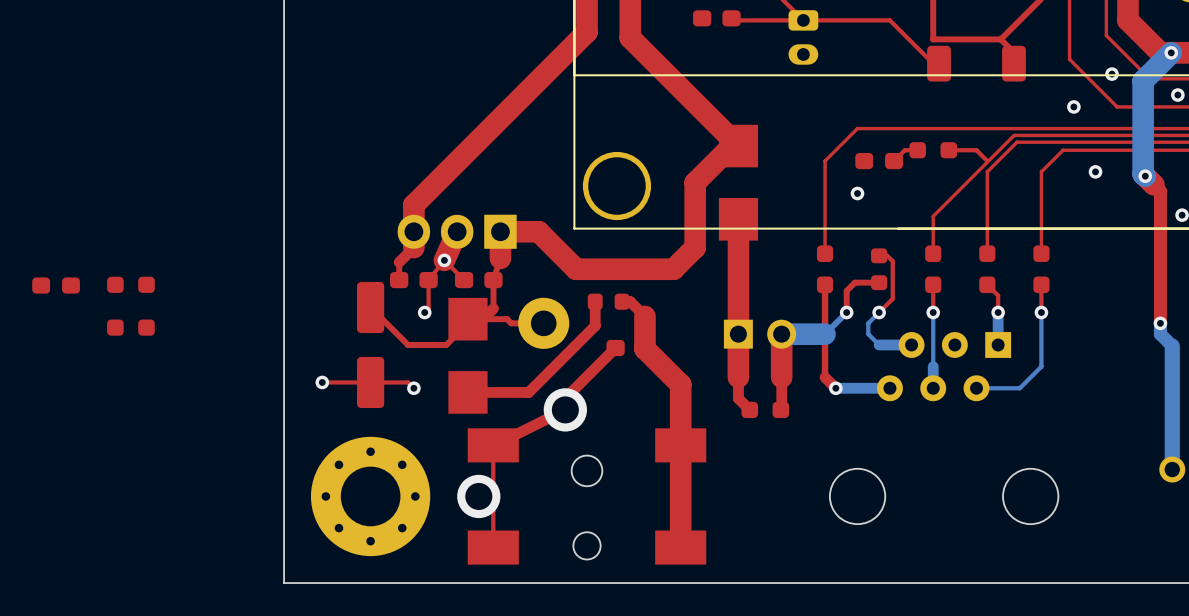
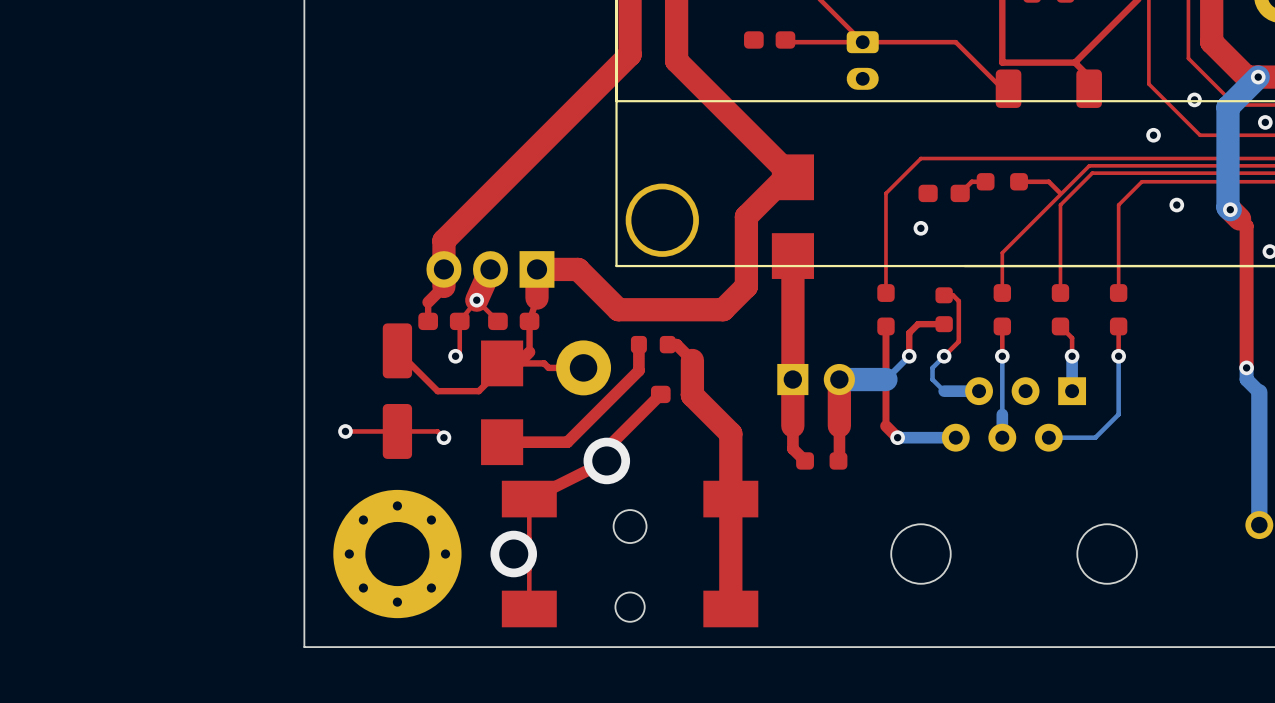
part: (130, 284) -> none
part: (56, 285) -> none
part: (130, 327) -> none

